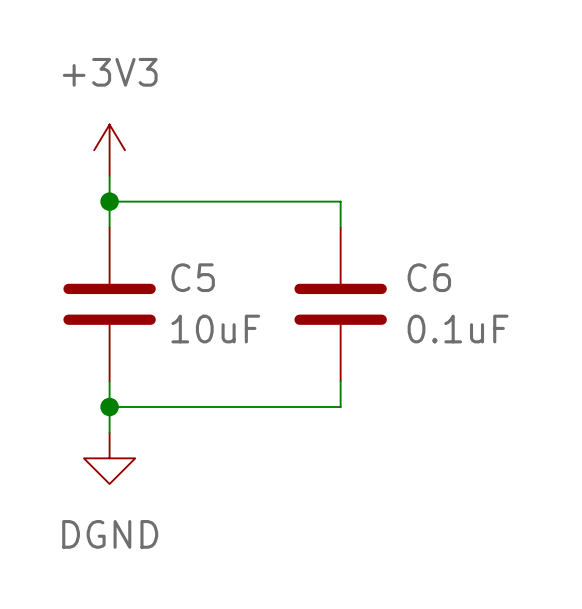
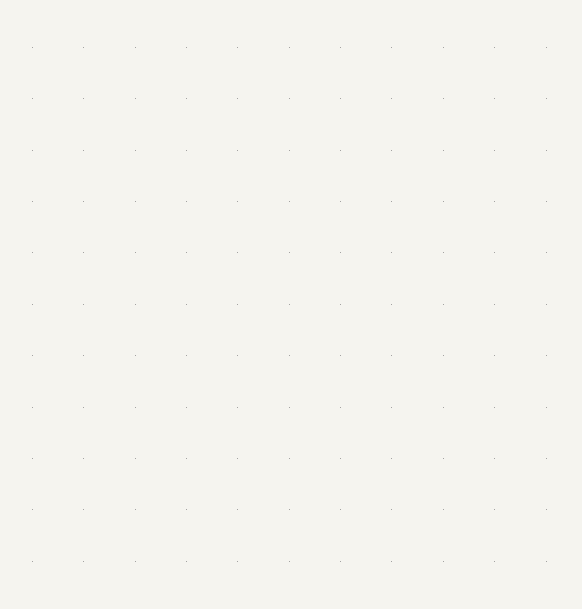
power symbol: +3V3 (109, 150) -> none
wire: (109, 175) (109, 227) -> none
wire: (109, 201) (340, 201) (340, 227) -> none
junction: (109, 201) -> none
C5: 10uF (109, 304) -> none
C6: 0.1uF (340, 304) -> none
wire: (109, 381) (109, 432) -> none
wire: (340, 381) (340, 407) (109, 407) -> none
junction: (109, 407) -> none
power symbol: DGND (109, 458) -> none

